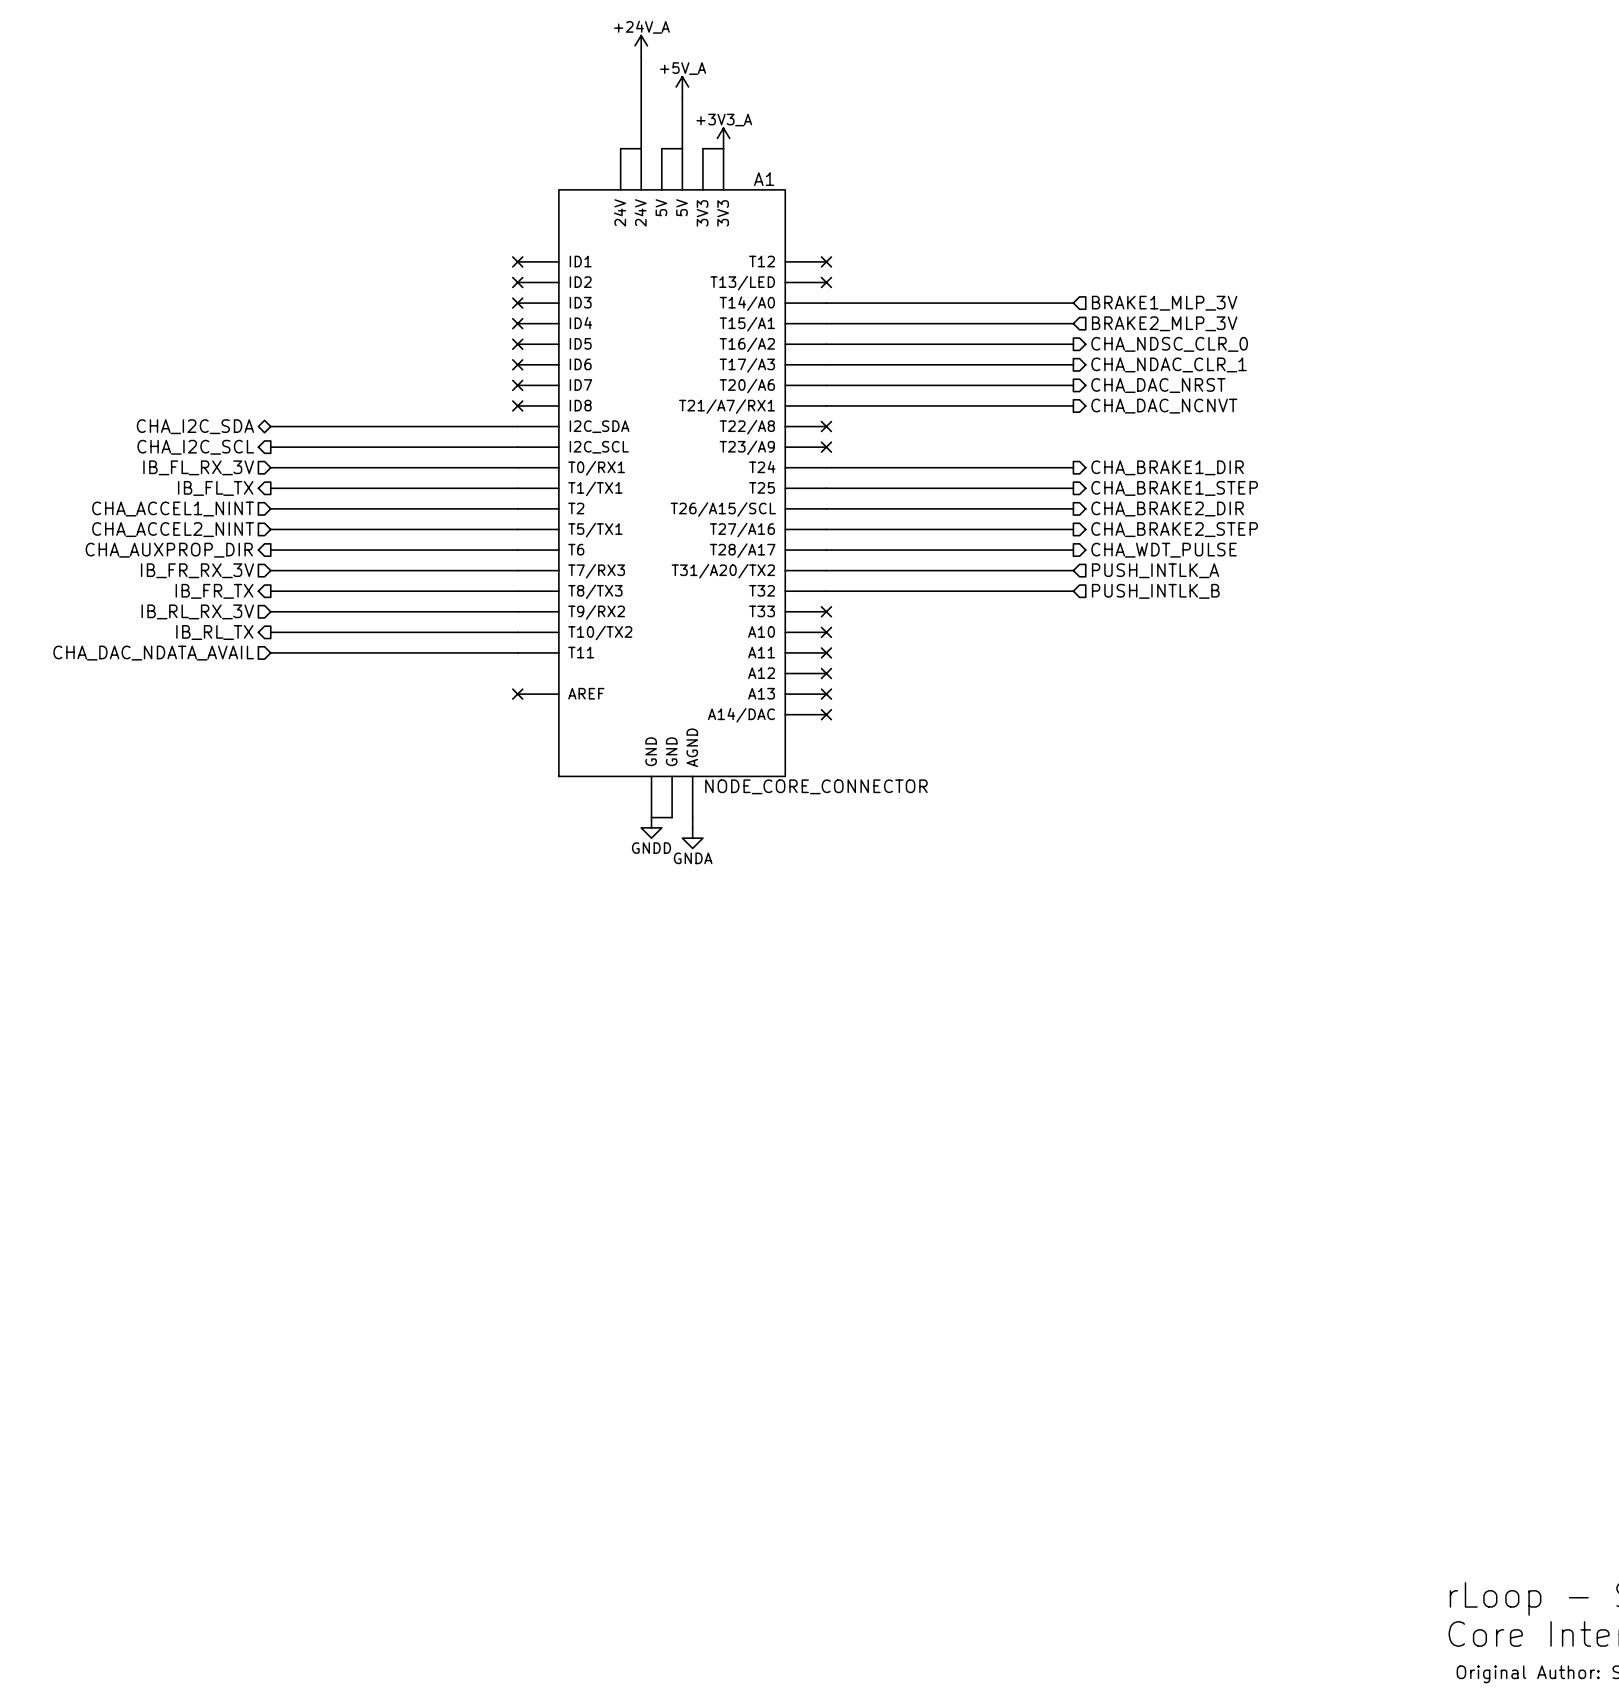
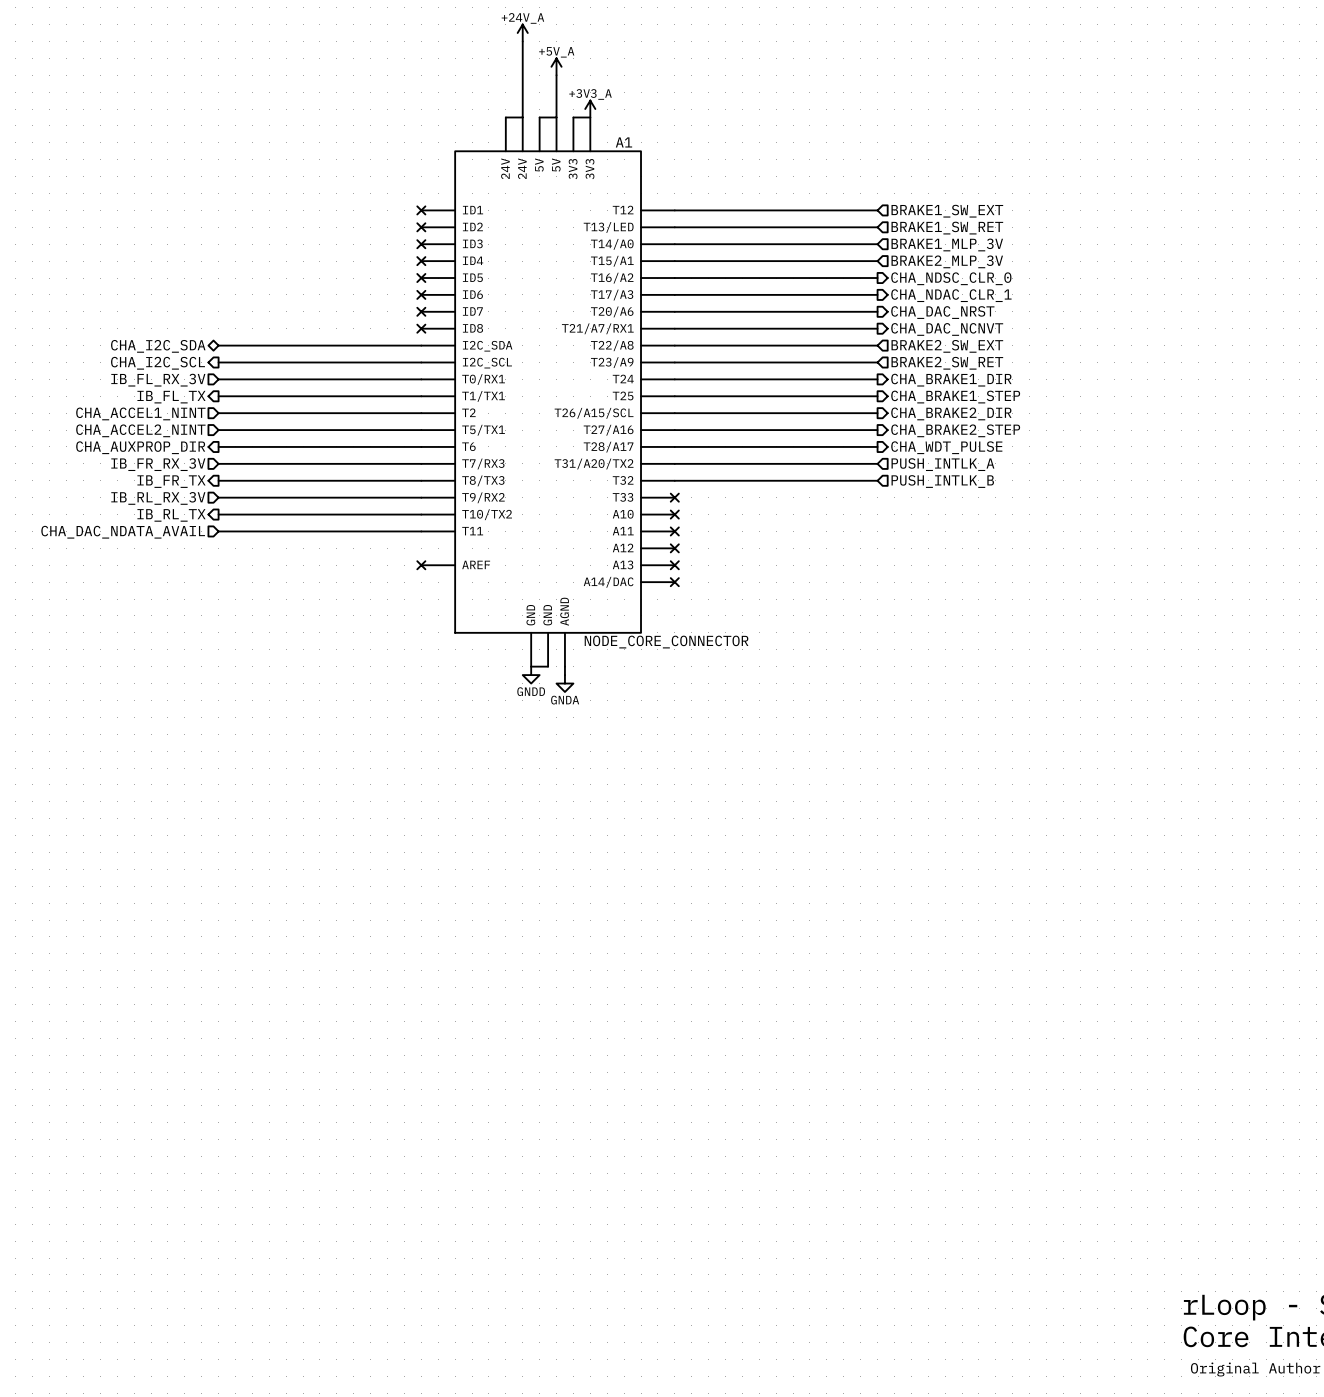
wire: none -> (674, 210) (877, 210)
no-connect mark: (826, 261) -> none
hierarchical label: none -> BRAKE1_SW_EXT (947, 211)
wire: none -> (674, 227) (877, 227)
no-connect mark: (826, 282) -> none
hierarchical label: none -> BRAKE1_SW_RET (947, 228)
wire: none -> (674, 345) (877, 345)
no-connect mark: (826, 426) -> none
hierarchical label: none -> BRAKE2_SW_EXT (947, 346)
wire: none -> (674, 362) (877, 362)
no-connect mark: (826, 447) -> none
hierarchical label: none -> BRAKE2_SW_RET (947, 363)

